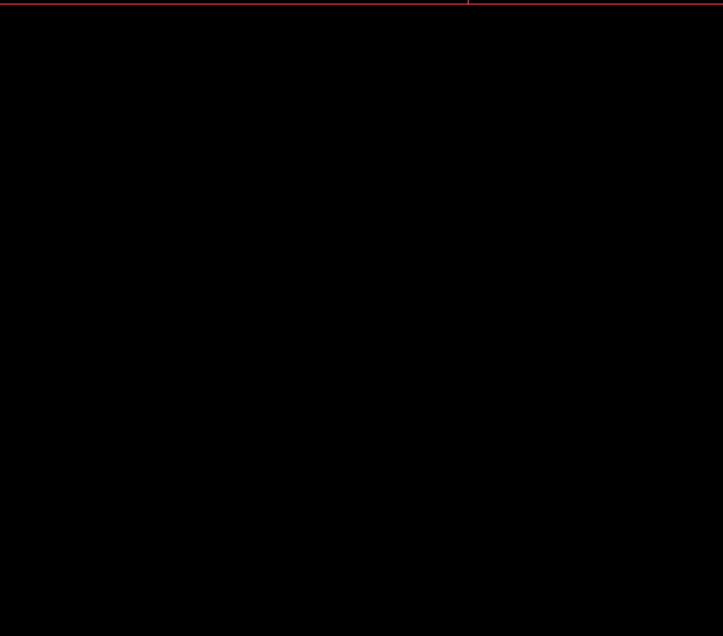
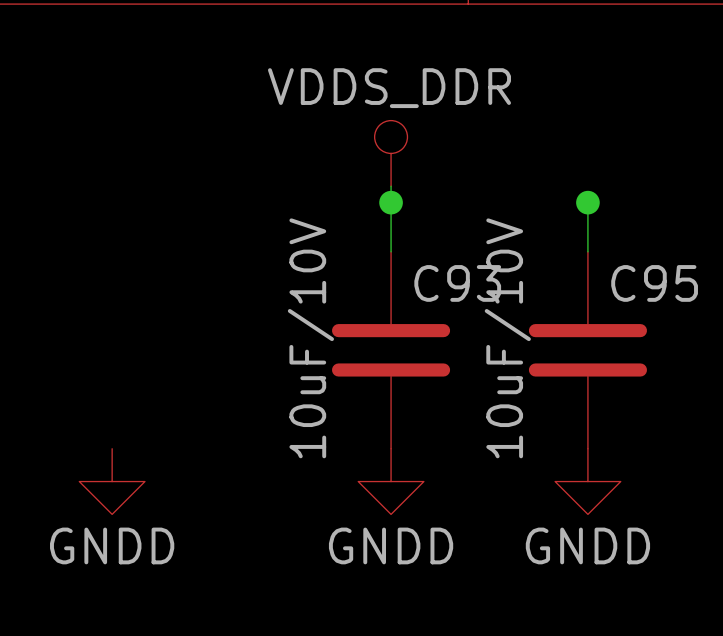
power symbol: none -> VDDS_DDR (391, 153)
wire: none -> (391, 186) (391, 251)
junction: none -> (391, 202)
wire: none -> (587, 202) (587, 251)
junction: none -> (587, 202)
C93: none -> 10uF/10V (391, 350)
C95: none -> 10uF/10V (587, 350)
power symbol: none -> GNDD (112, 481)
power symbol: none -> GNDD (391, 481)
power symbol: none -> GNDD (587, 481)

